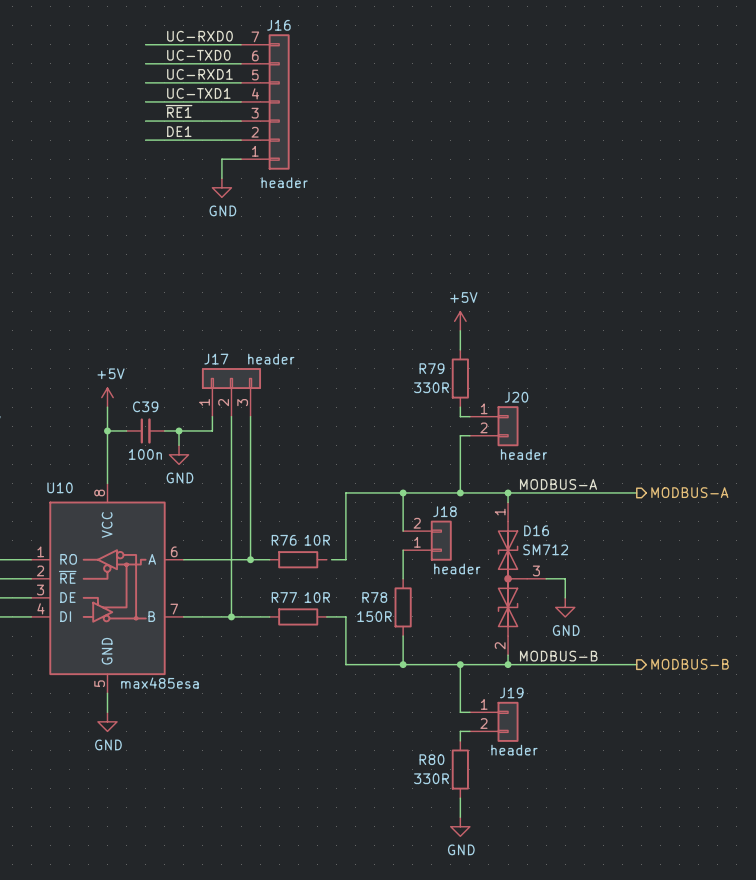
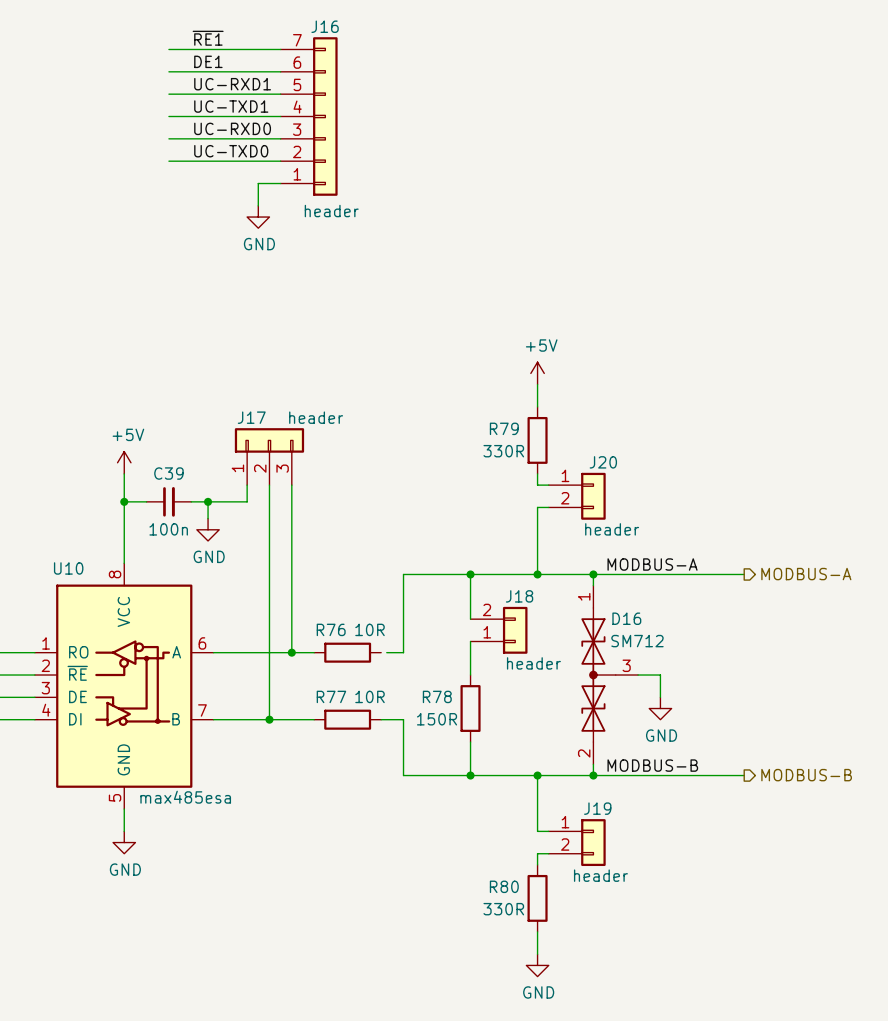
label: UC-RXD0 (199, 36) -> ~{RE1} (208, 38)
label: UC-TXD0 (198, 55) -> DE1 (208, 61)
label: ~{RE1} (179, 111) -> UC-RXD0 (232, 128)
label: DE1 (179, 131) -> UC-TXD0 (231, 151)

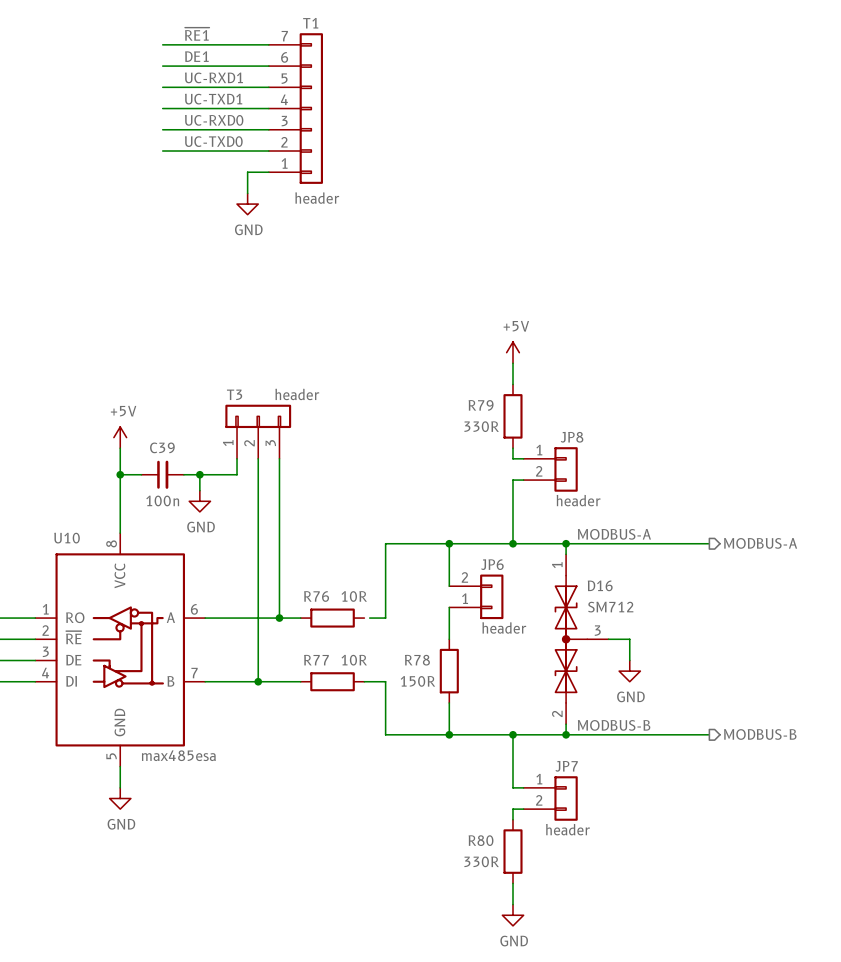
J16 name: J16 (325, 26) -> T1 (310, 23)
J17 name: J17 (251, 417) -> T3 (234, 394)
J20 name: J20 (603, 462) -> JP8 (572, 437)
J18 name: J18 (519, 596) -> JP6 (492, 564)
J19 name: J19 (597, 808) -> JP7 (566, 766)

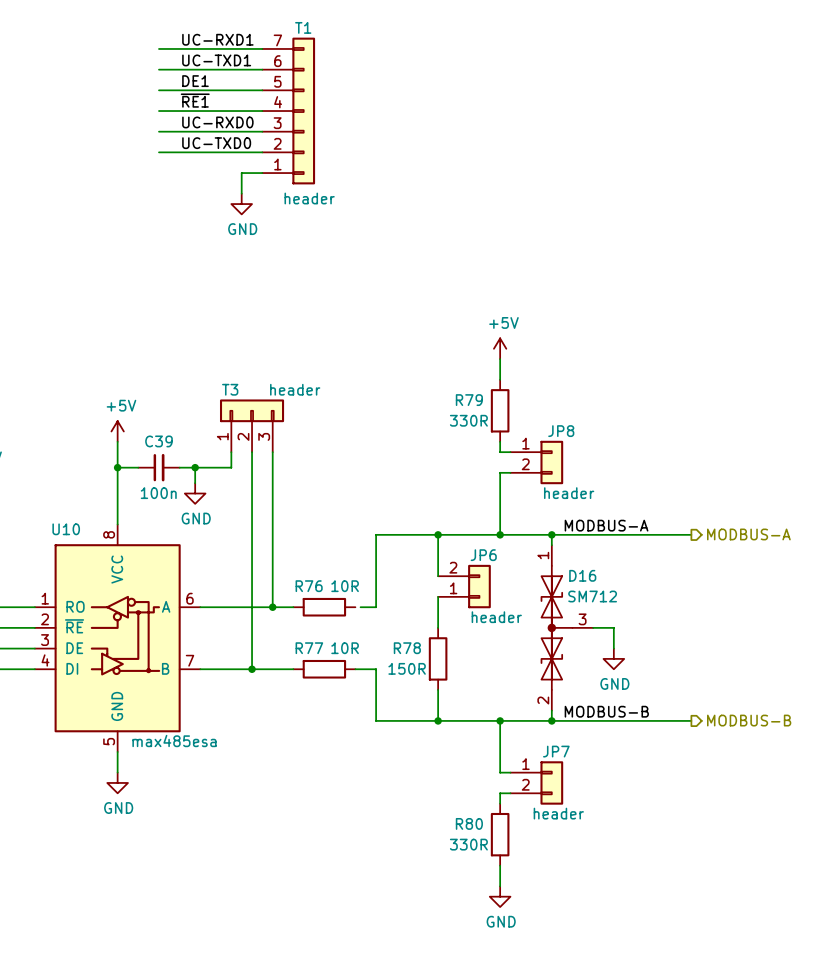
label: ~{RE1} (197, 34) -> UC-RXD1 (217, 39)
label: DE1 (196, 56) -> UC-TXD1 (216, 60)
label: UC-RXD1 (213, 77) -> DE1 (195, 81)
label: UC-TXD1 (213, 99) -> ~{RE1} (195, 100)

